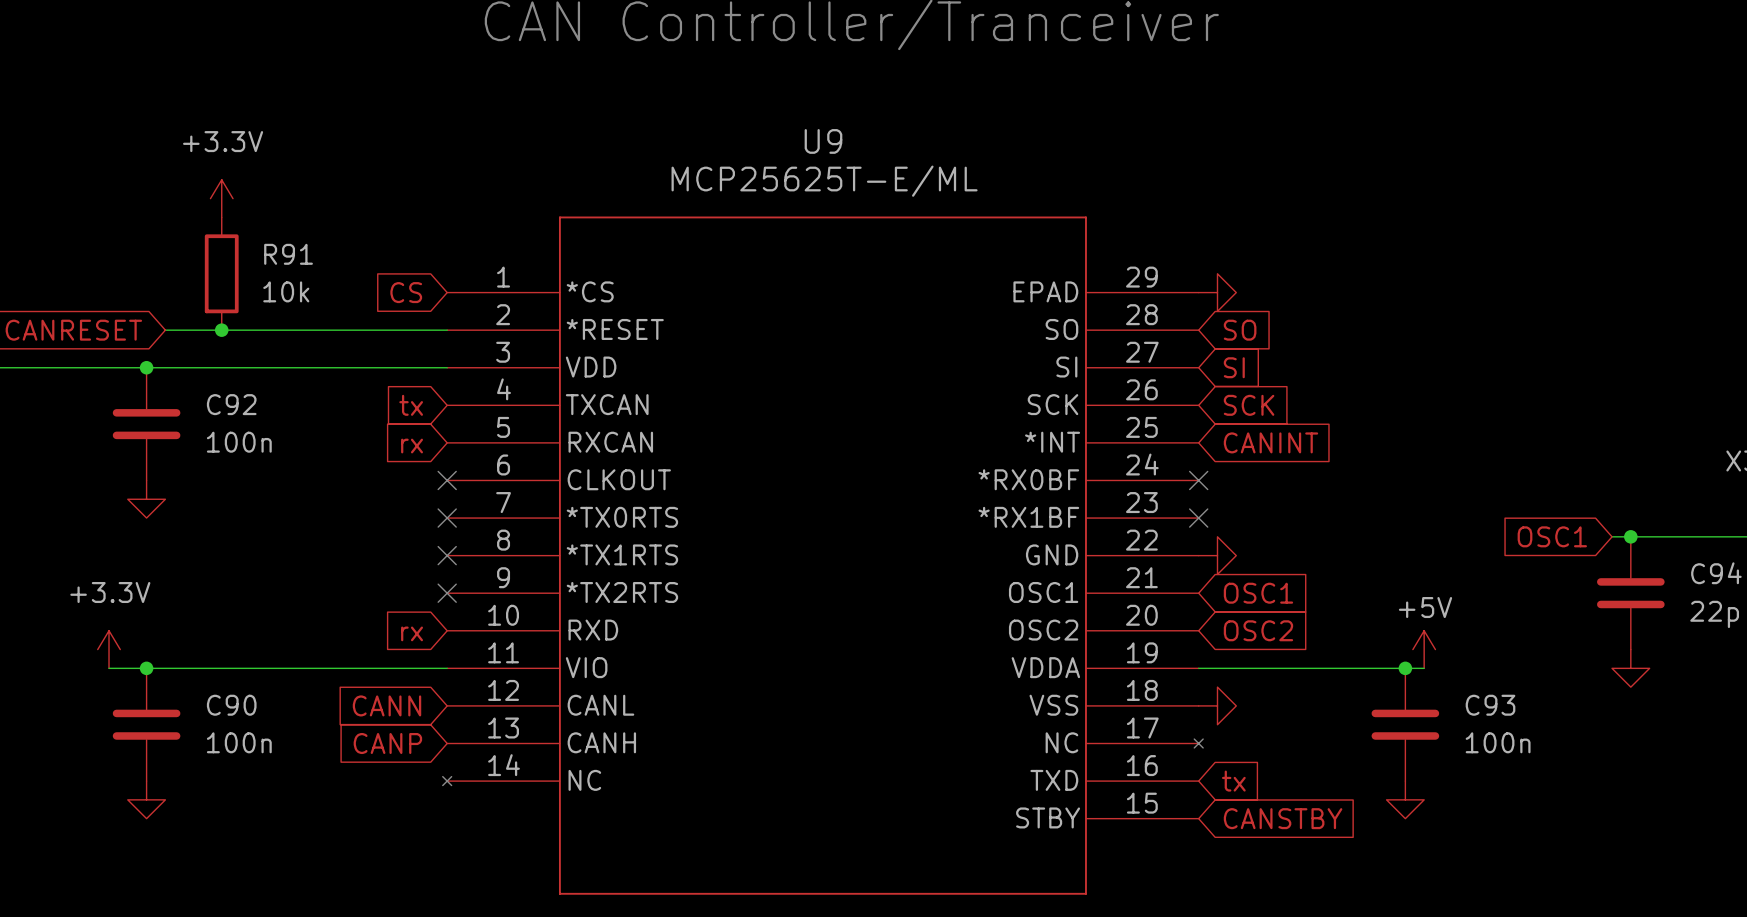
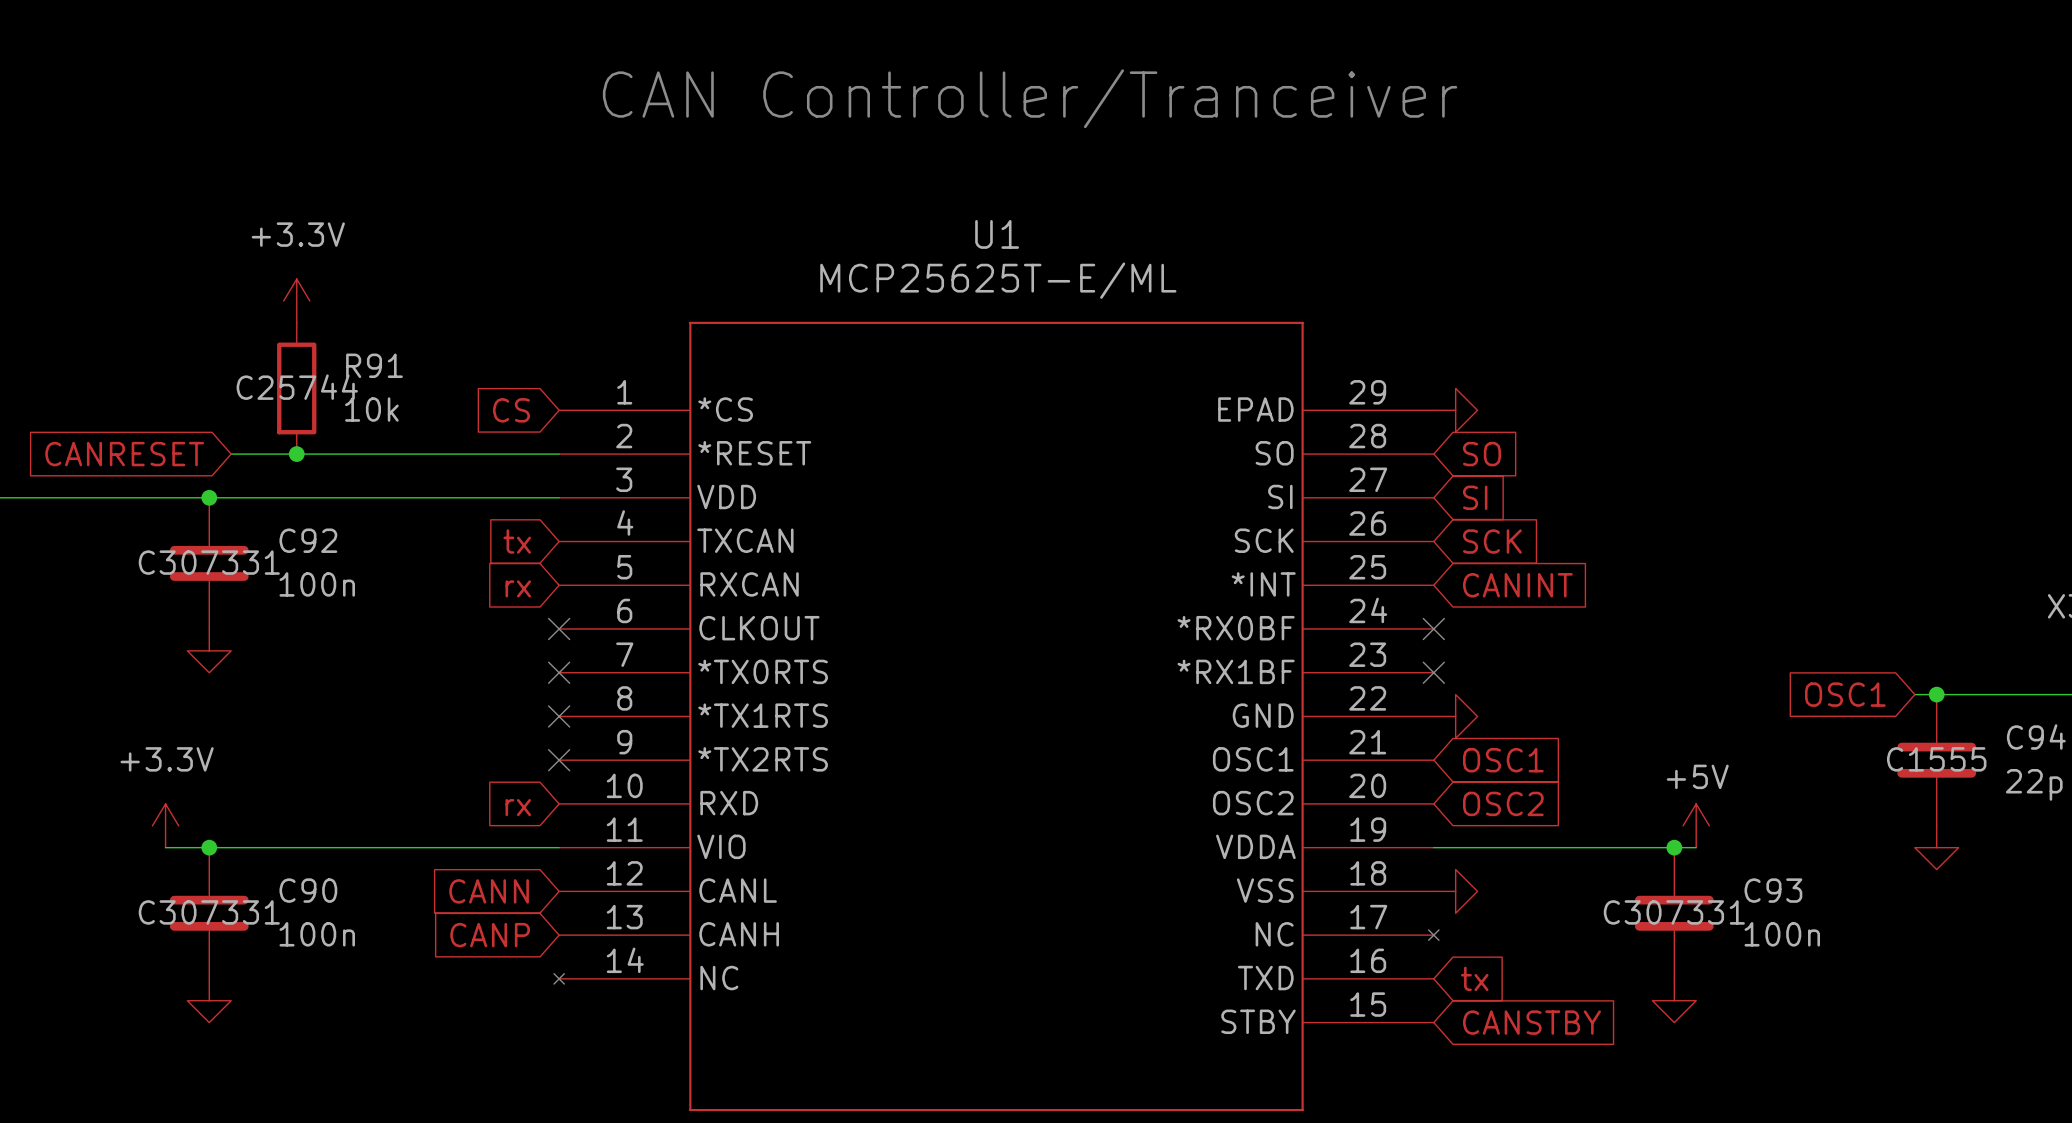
U9 name: U9 (823, 141) -> U1 (997, 234)
R91 text: none -> C25744 (297, 387)
C92 text: none -> C307331 (209, 562)
C94 text: none -> C1555 (1936, 759)
C90 text: none -> C307331 (209, 912)
C93 text: none -> C307331 (1674, 912)

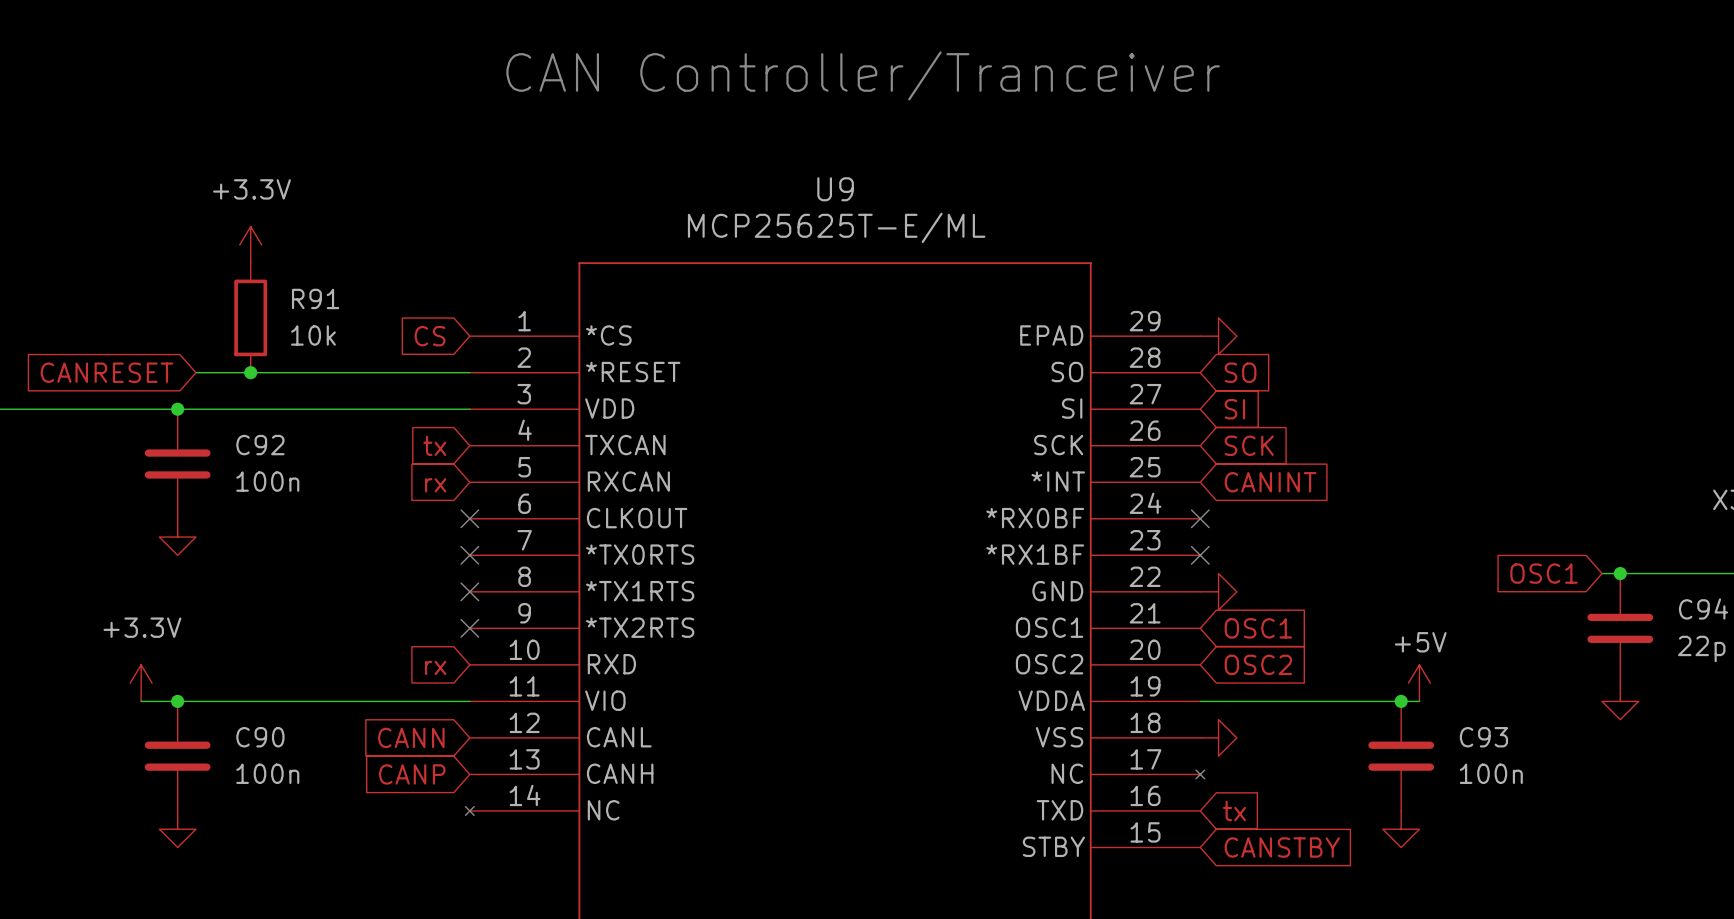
U1 name: U1 (997, 234) -> U9 (835, 189)
R91 text: C25744 (297, 387) -> none
C92 text: C307331 (209, 562) -> none
C94 text: C1555 (1936, 759) -> none
C90 text: C307331 (209, 912) -> none
C93 text: C307331 (1674, 912) -> none

